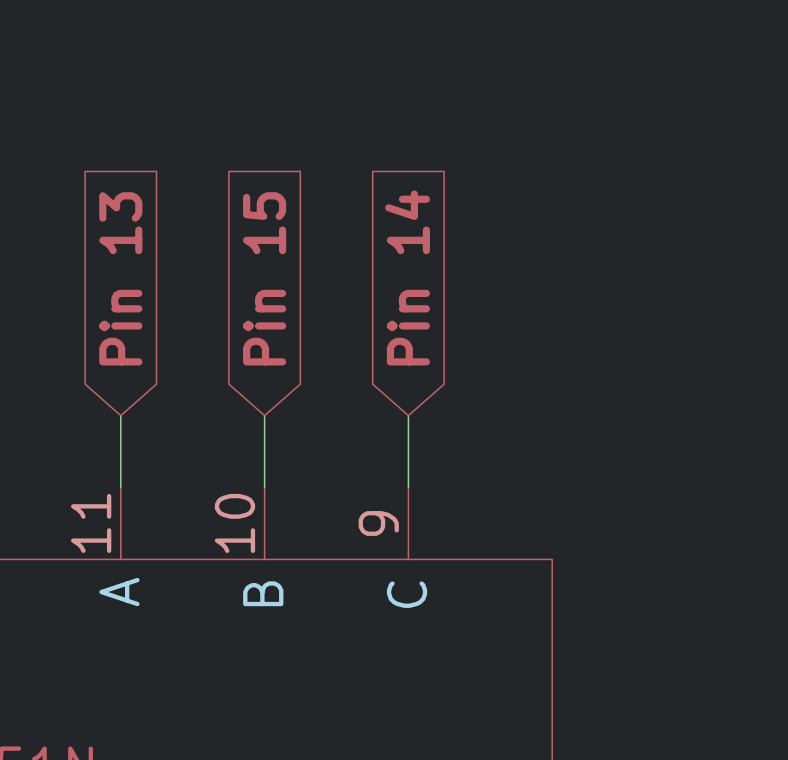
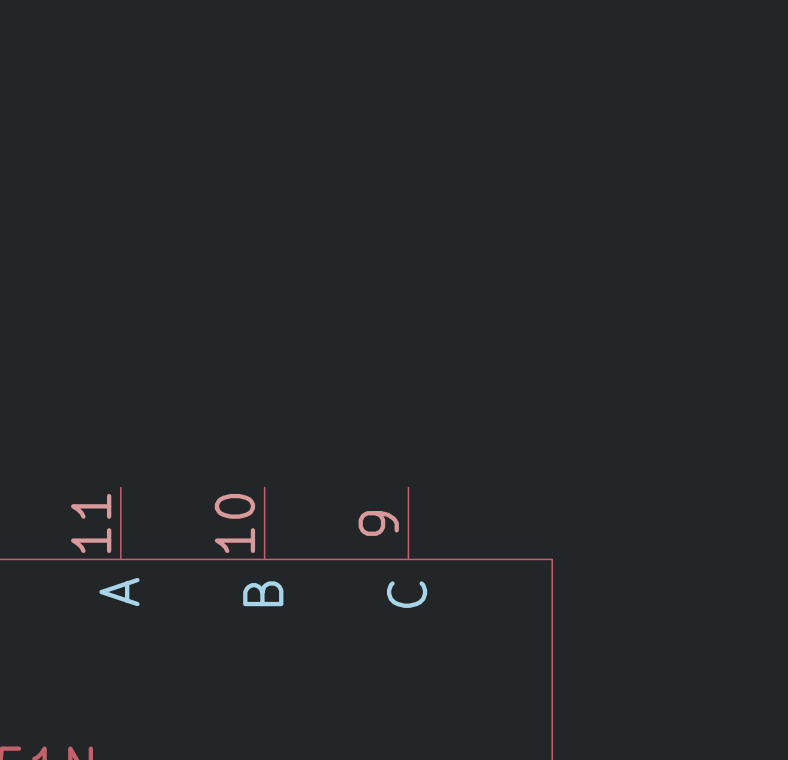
global label: Pin 13 (120, 278) -> none
global label: Pin 15 (264, 278) -> none
global label: Pin 14 (407, 278) -> none
wire: (120, 415) (120, 487) -> none
wire: (264, 415) (264, 487) -> none
wire: (408, 415) (408, 487) -> none

